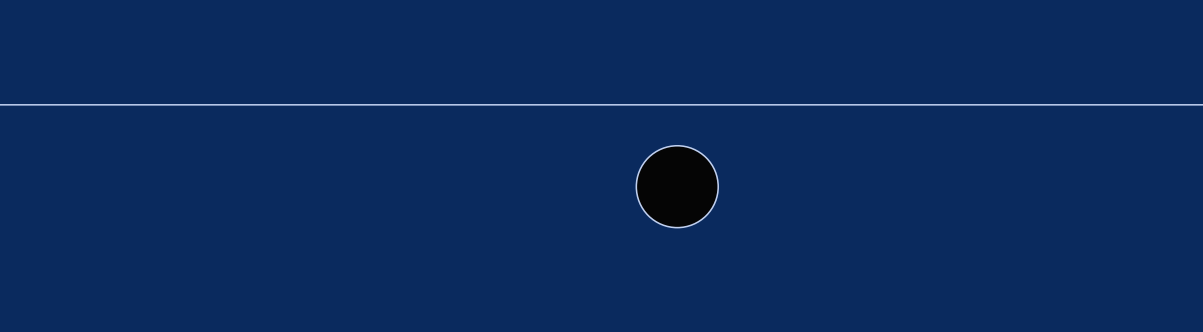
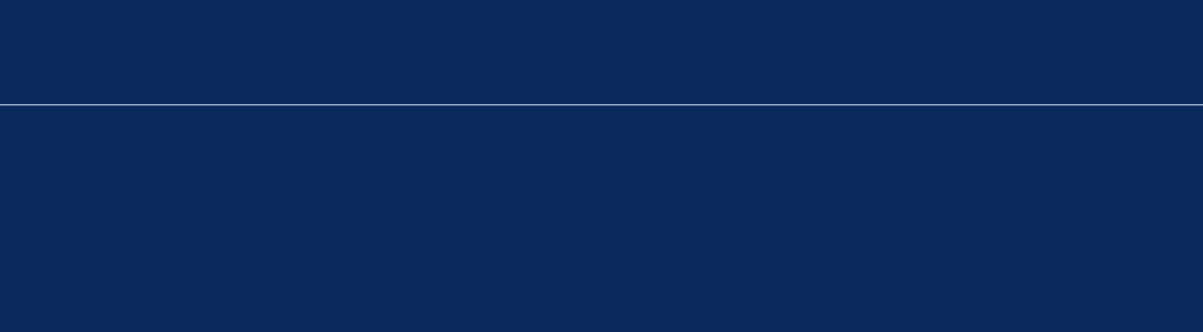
hole: (677, 186) -> none

